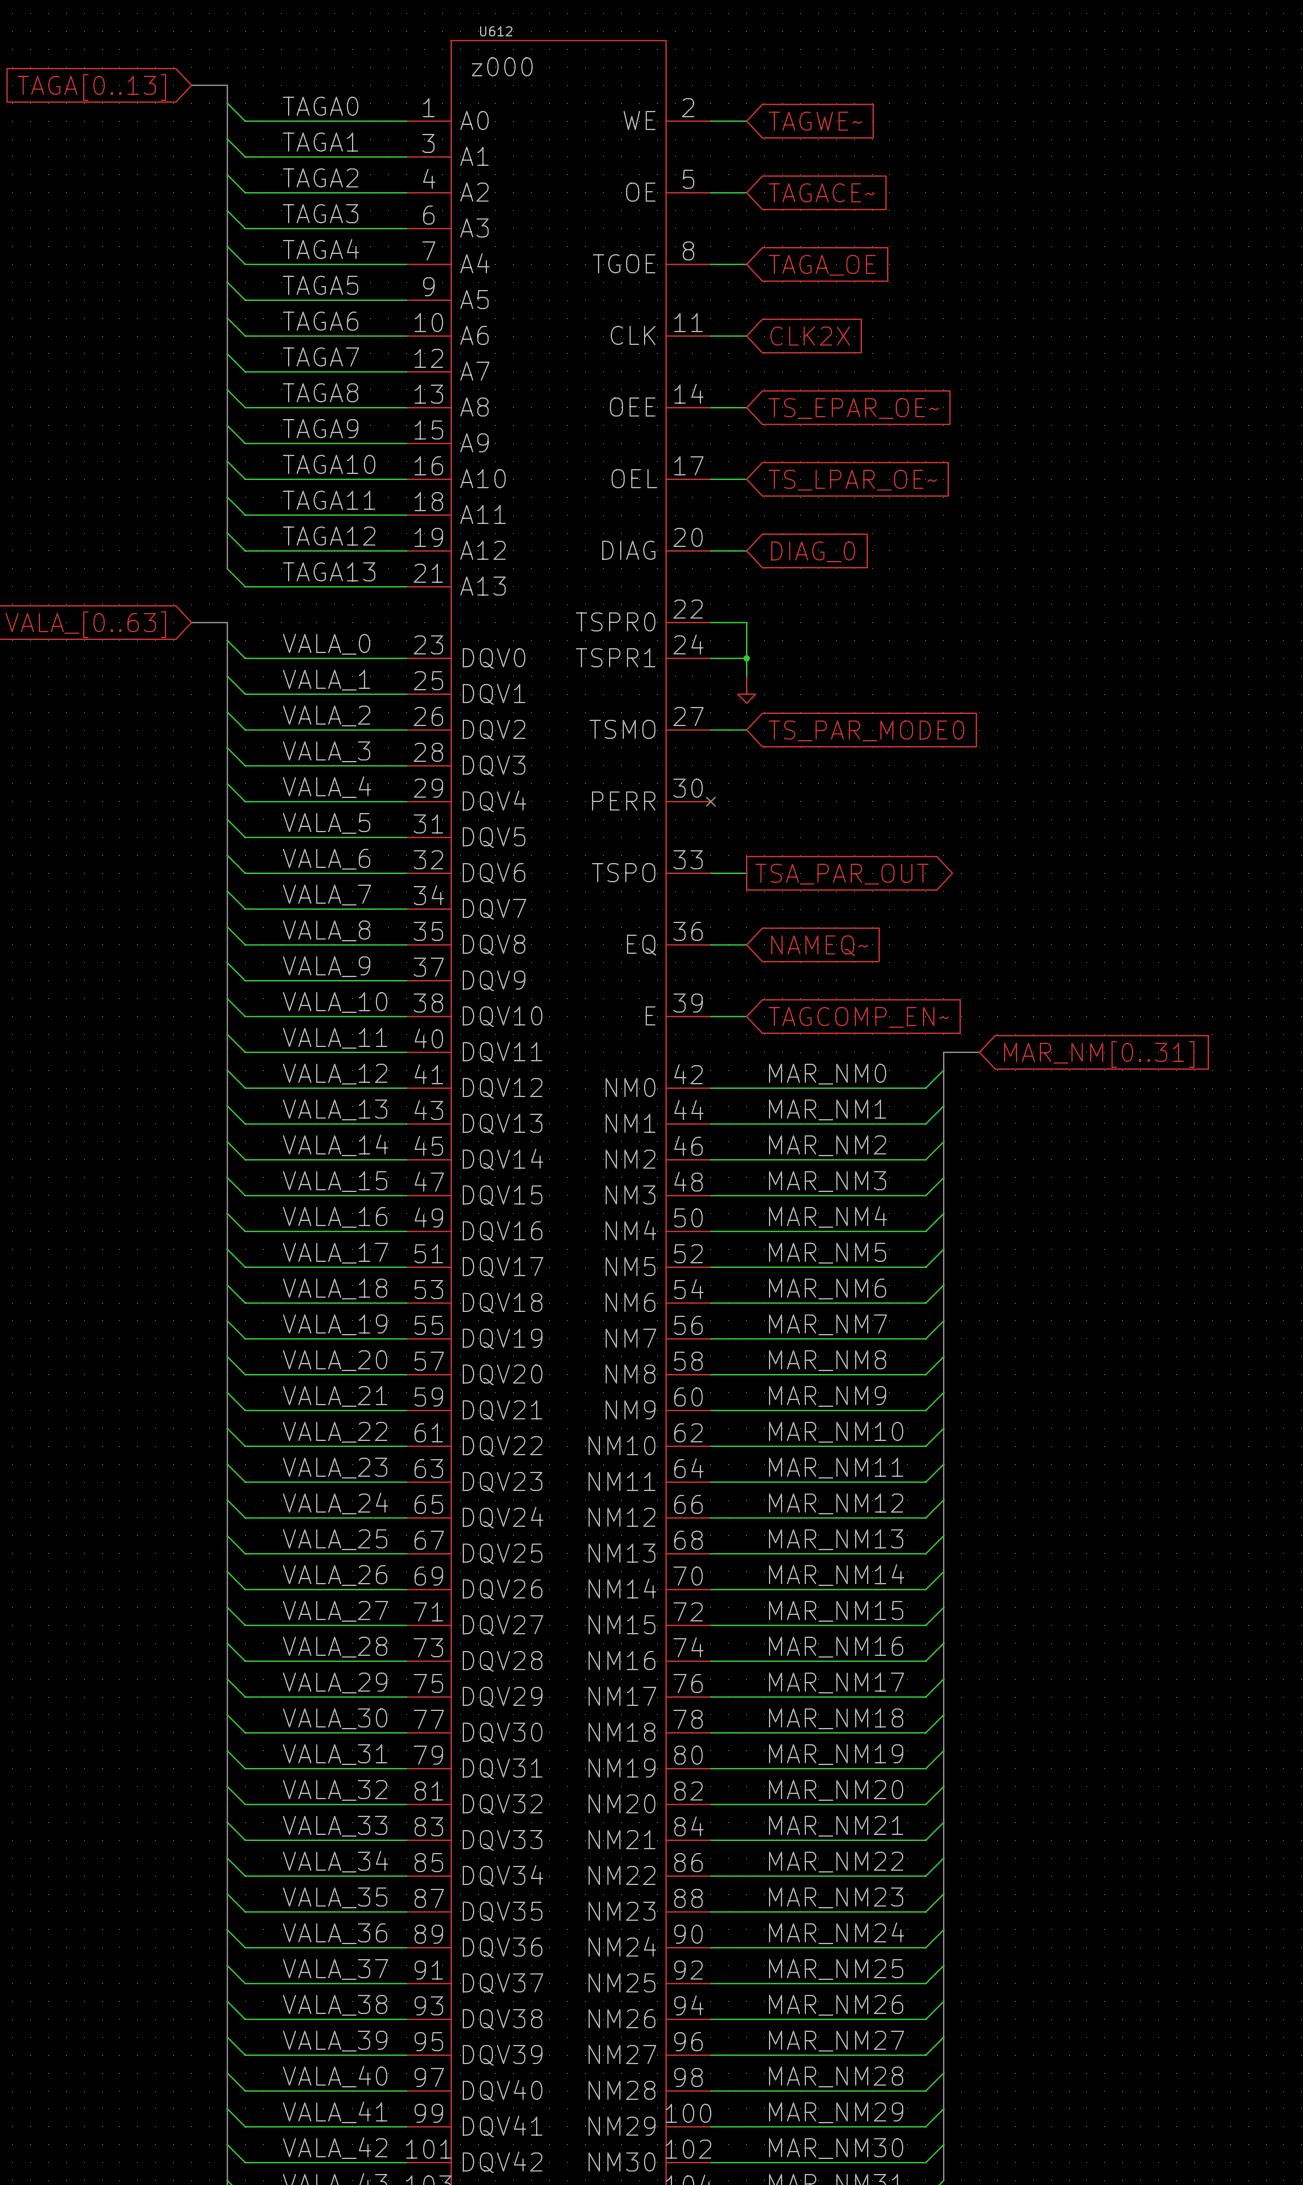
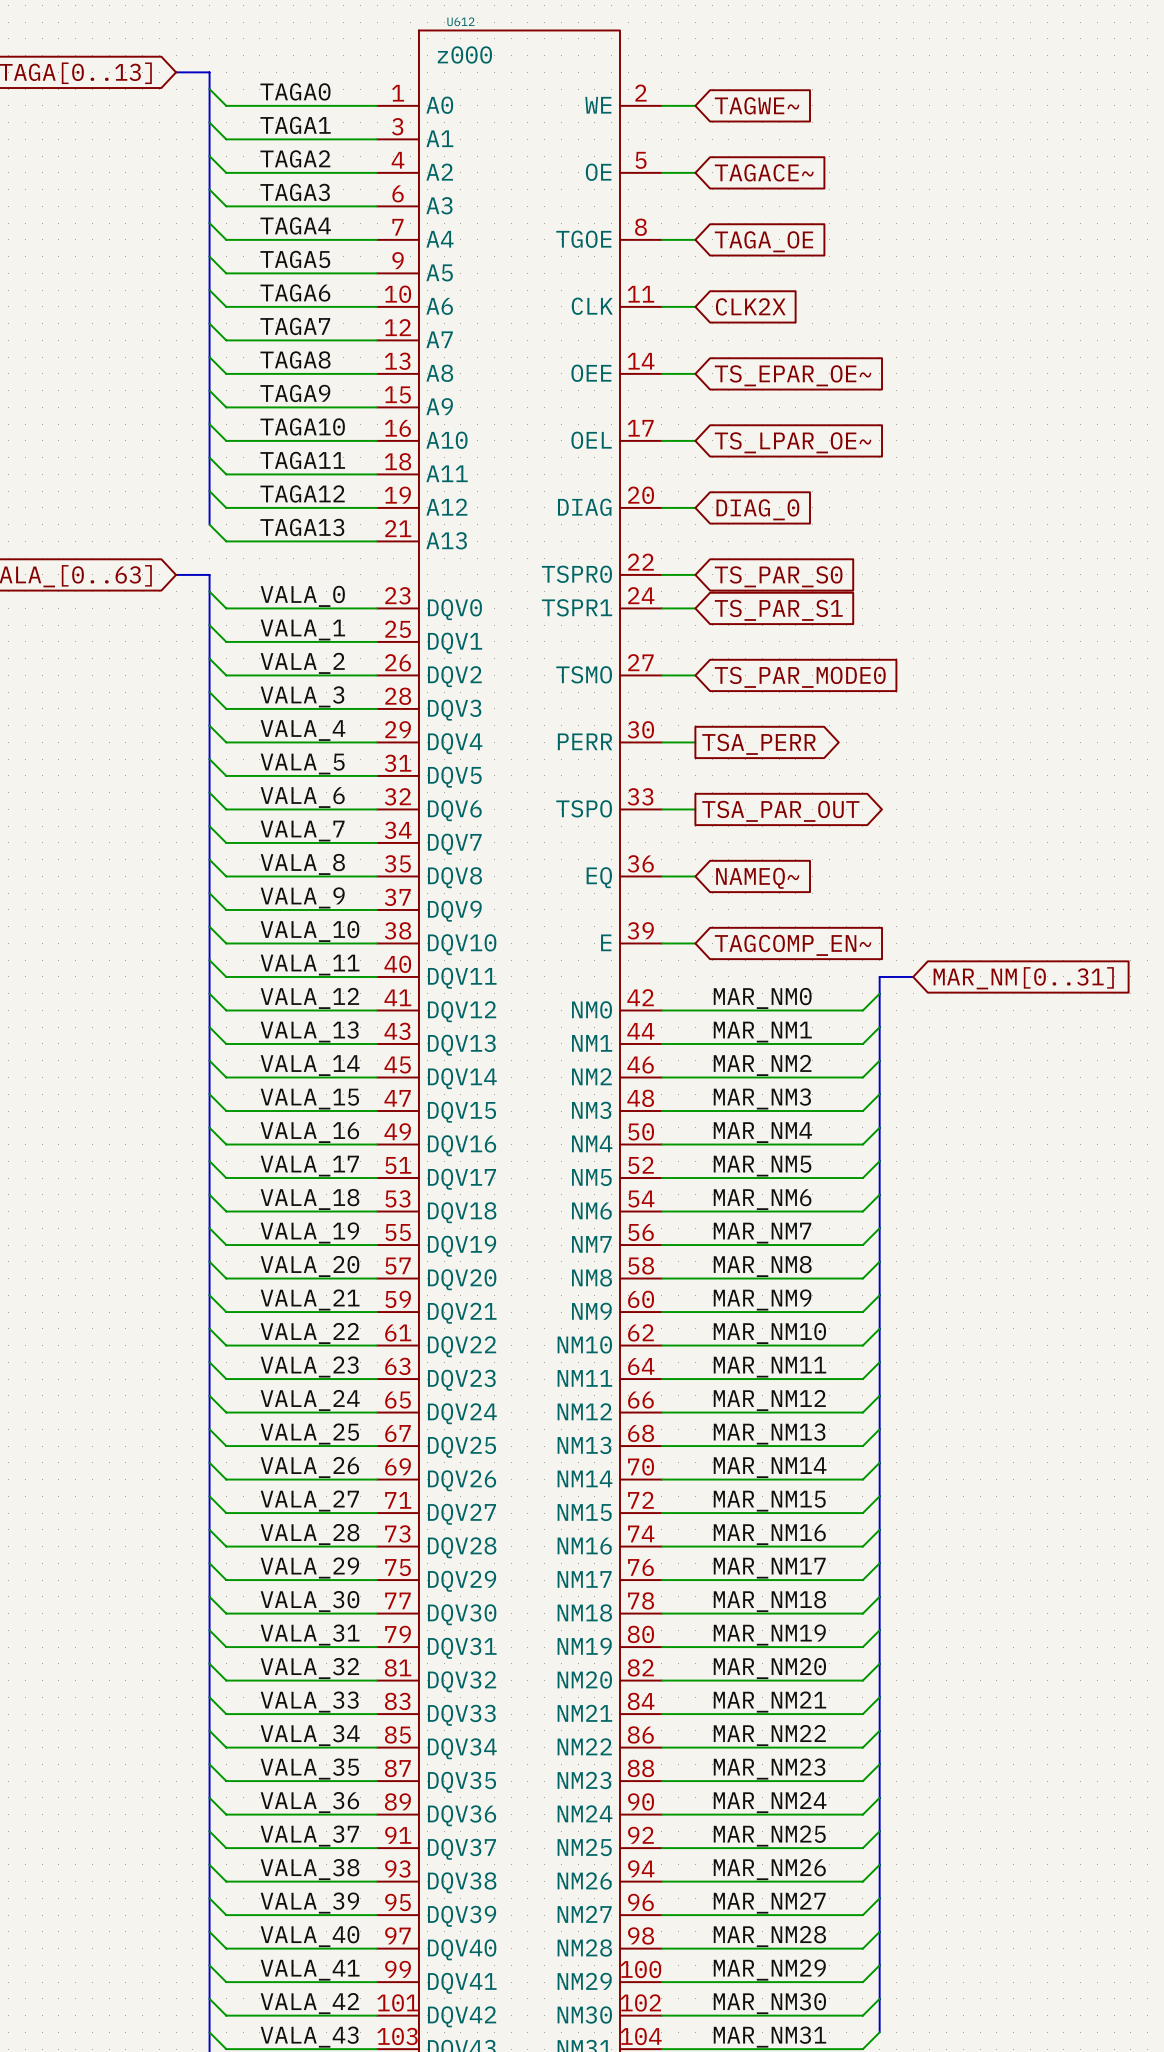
wire: (746, 622) (746, 676) -> none
global label: none -> TS_PAR_S0 (778, 576)
junction: (746, 658) -> none
global label: none -> TS_PAR_S1 (778, 610)
power symbol: (746, 690) -> none
wire: none -> (661, 742) (695, 742)
no-connect mark: (710, 801) -> none
global label: none -> TSA_PERR (758, 744)

